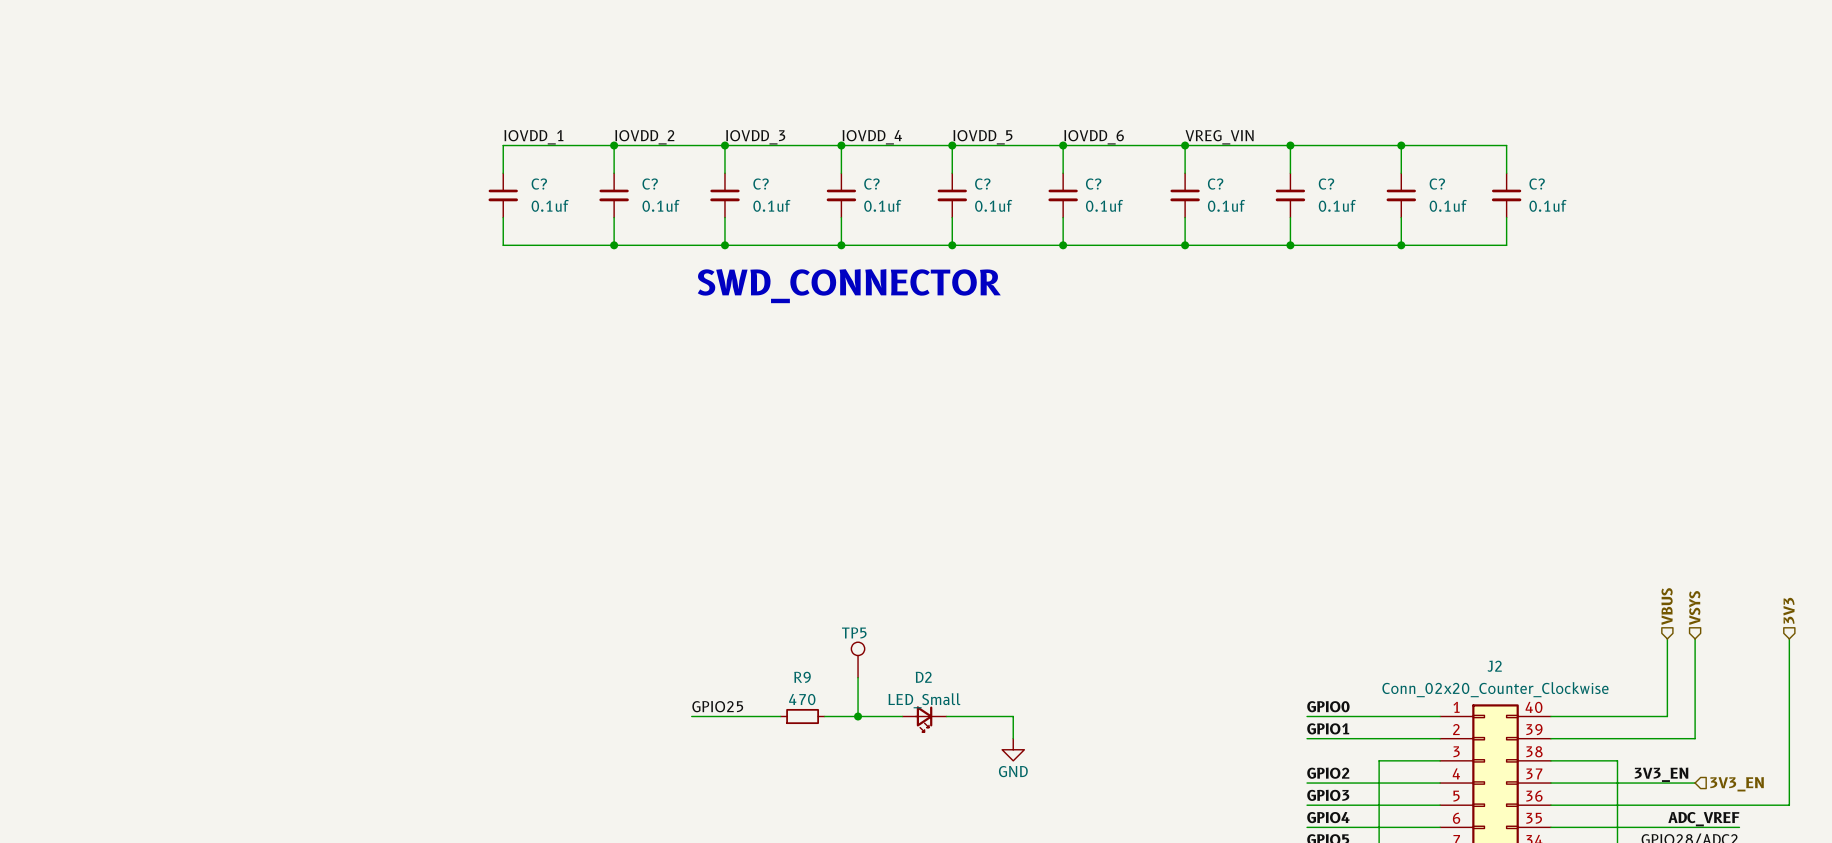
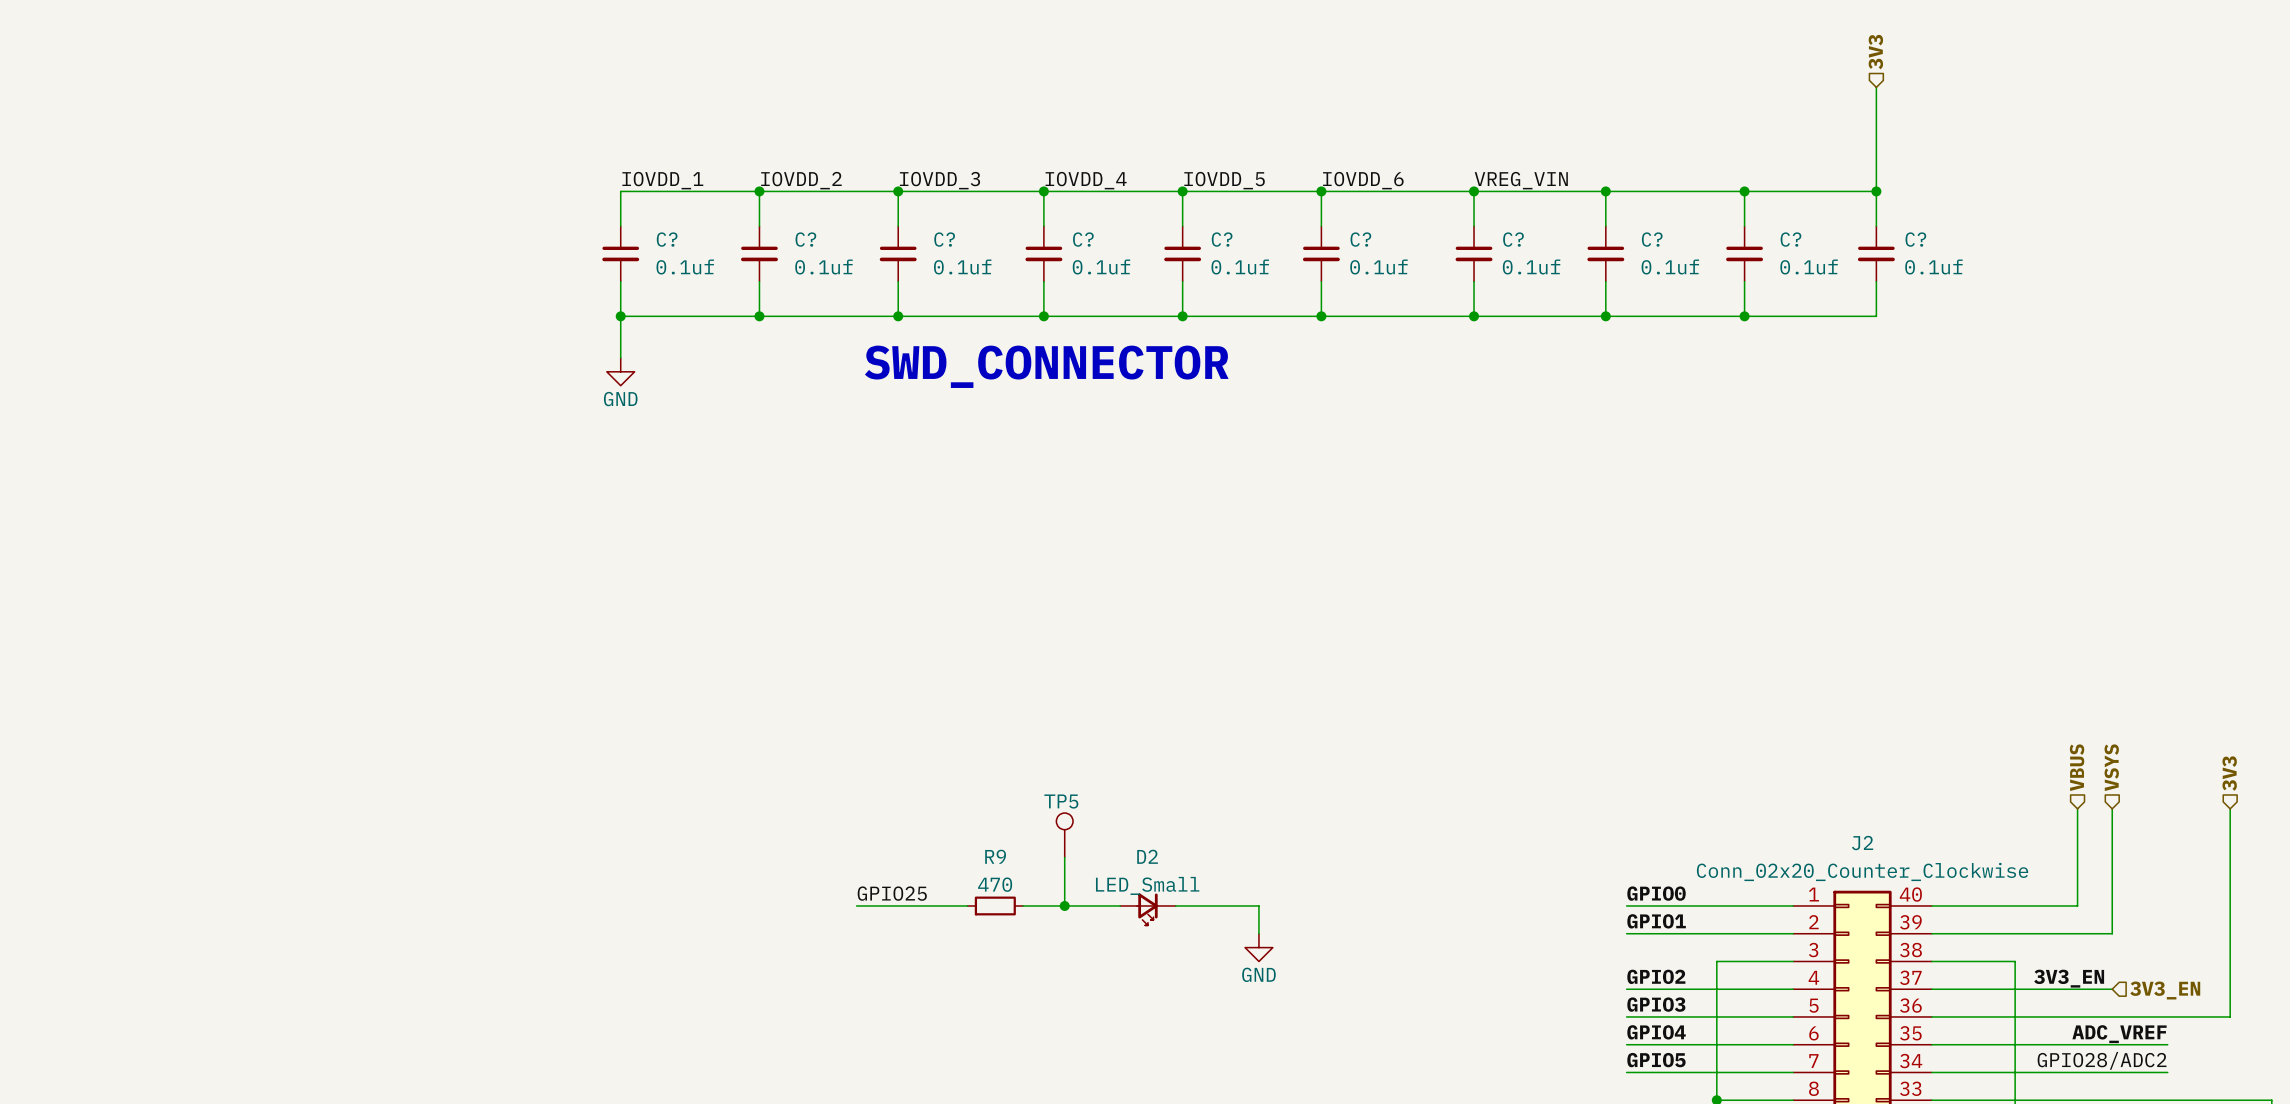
hierarchical label: none -> 3V3 (1875, 52)
wire: none -> (1876, 87) (1876, 191)
junction: none -> (1876, 191)
wire: none -> (620, 316) (620, 357)
junction: none -> (620, 316)
power symbol: none -> GND (620, 371)

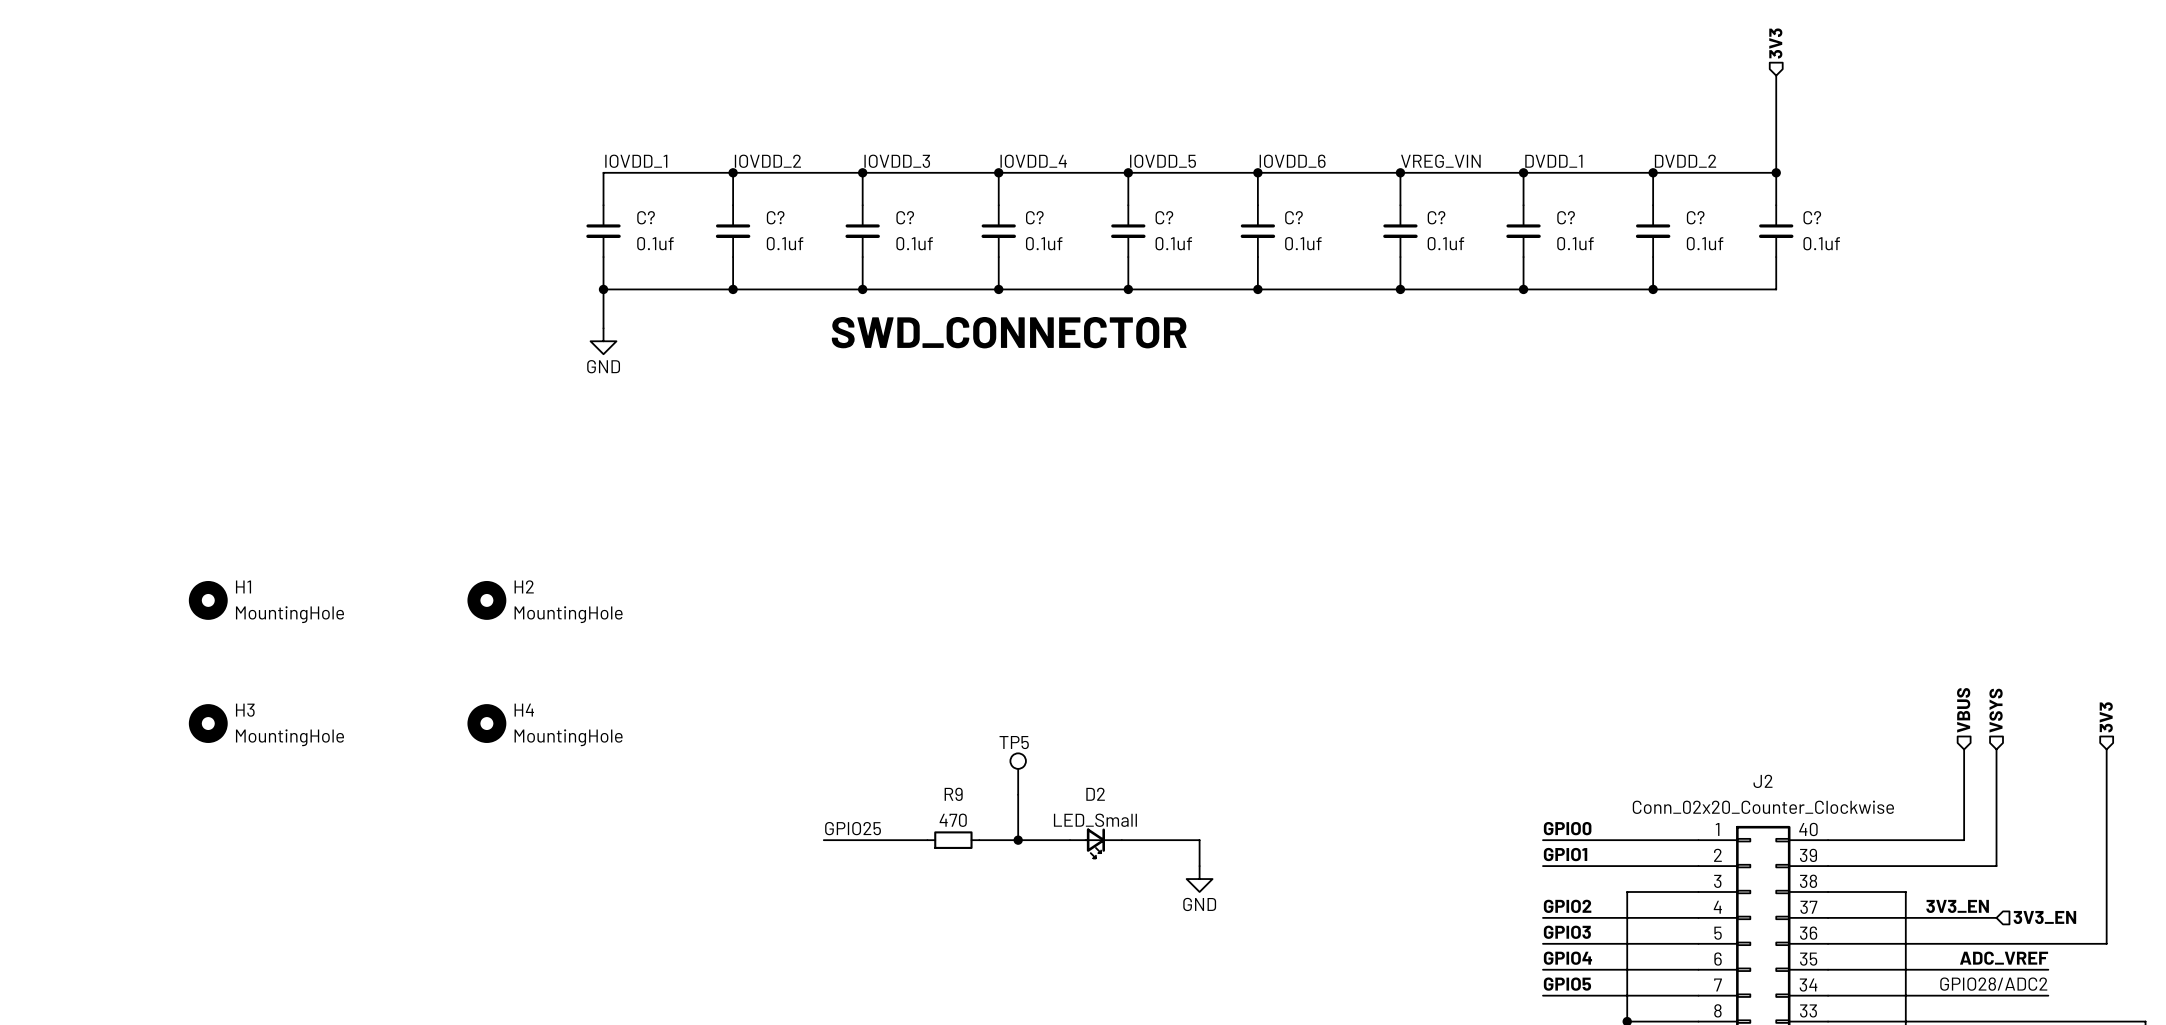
label: none -> DVDD_1 (1553, 161)
label: none -> DVDD_2 (1685, 161)
H1: none -> MountingHole (208, 600)
H2: none -> MountingHole (486, 600)
H3: none -> MountingHole (208, 723)
H4: none -> MountingHole (486, 723)

